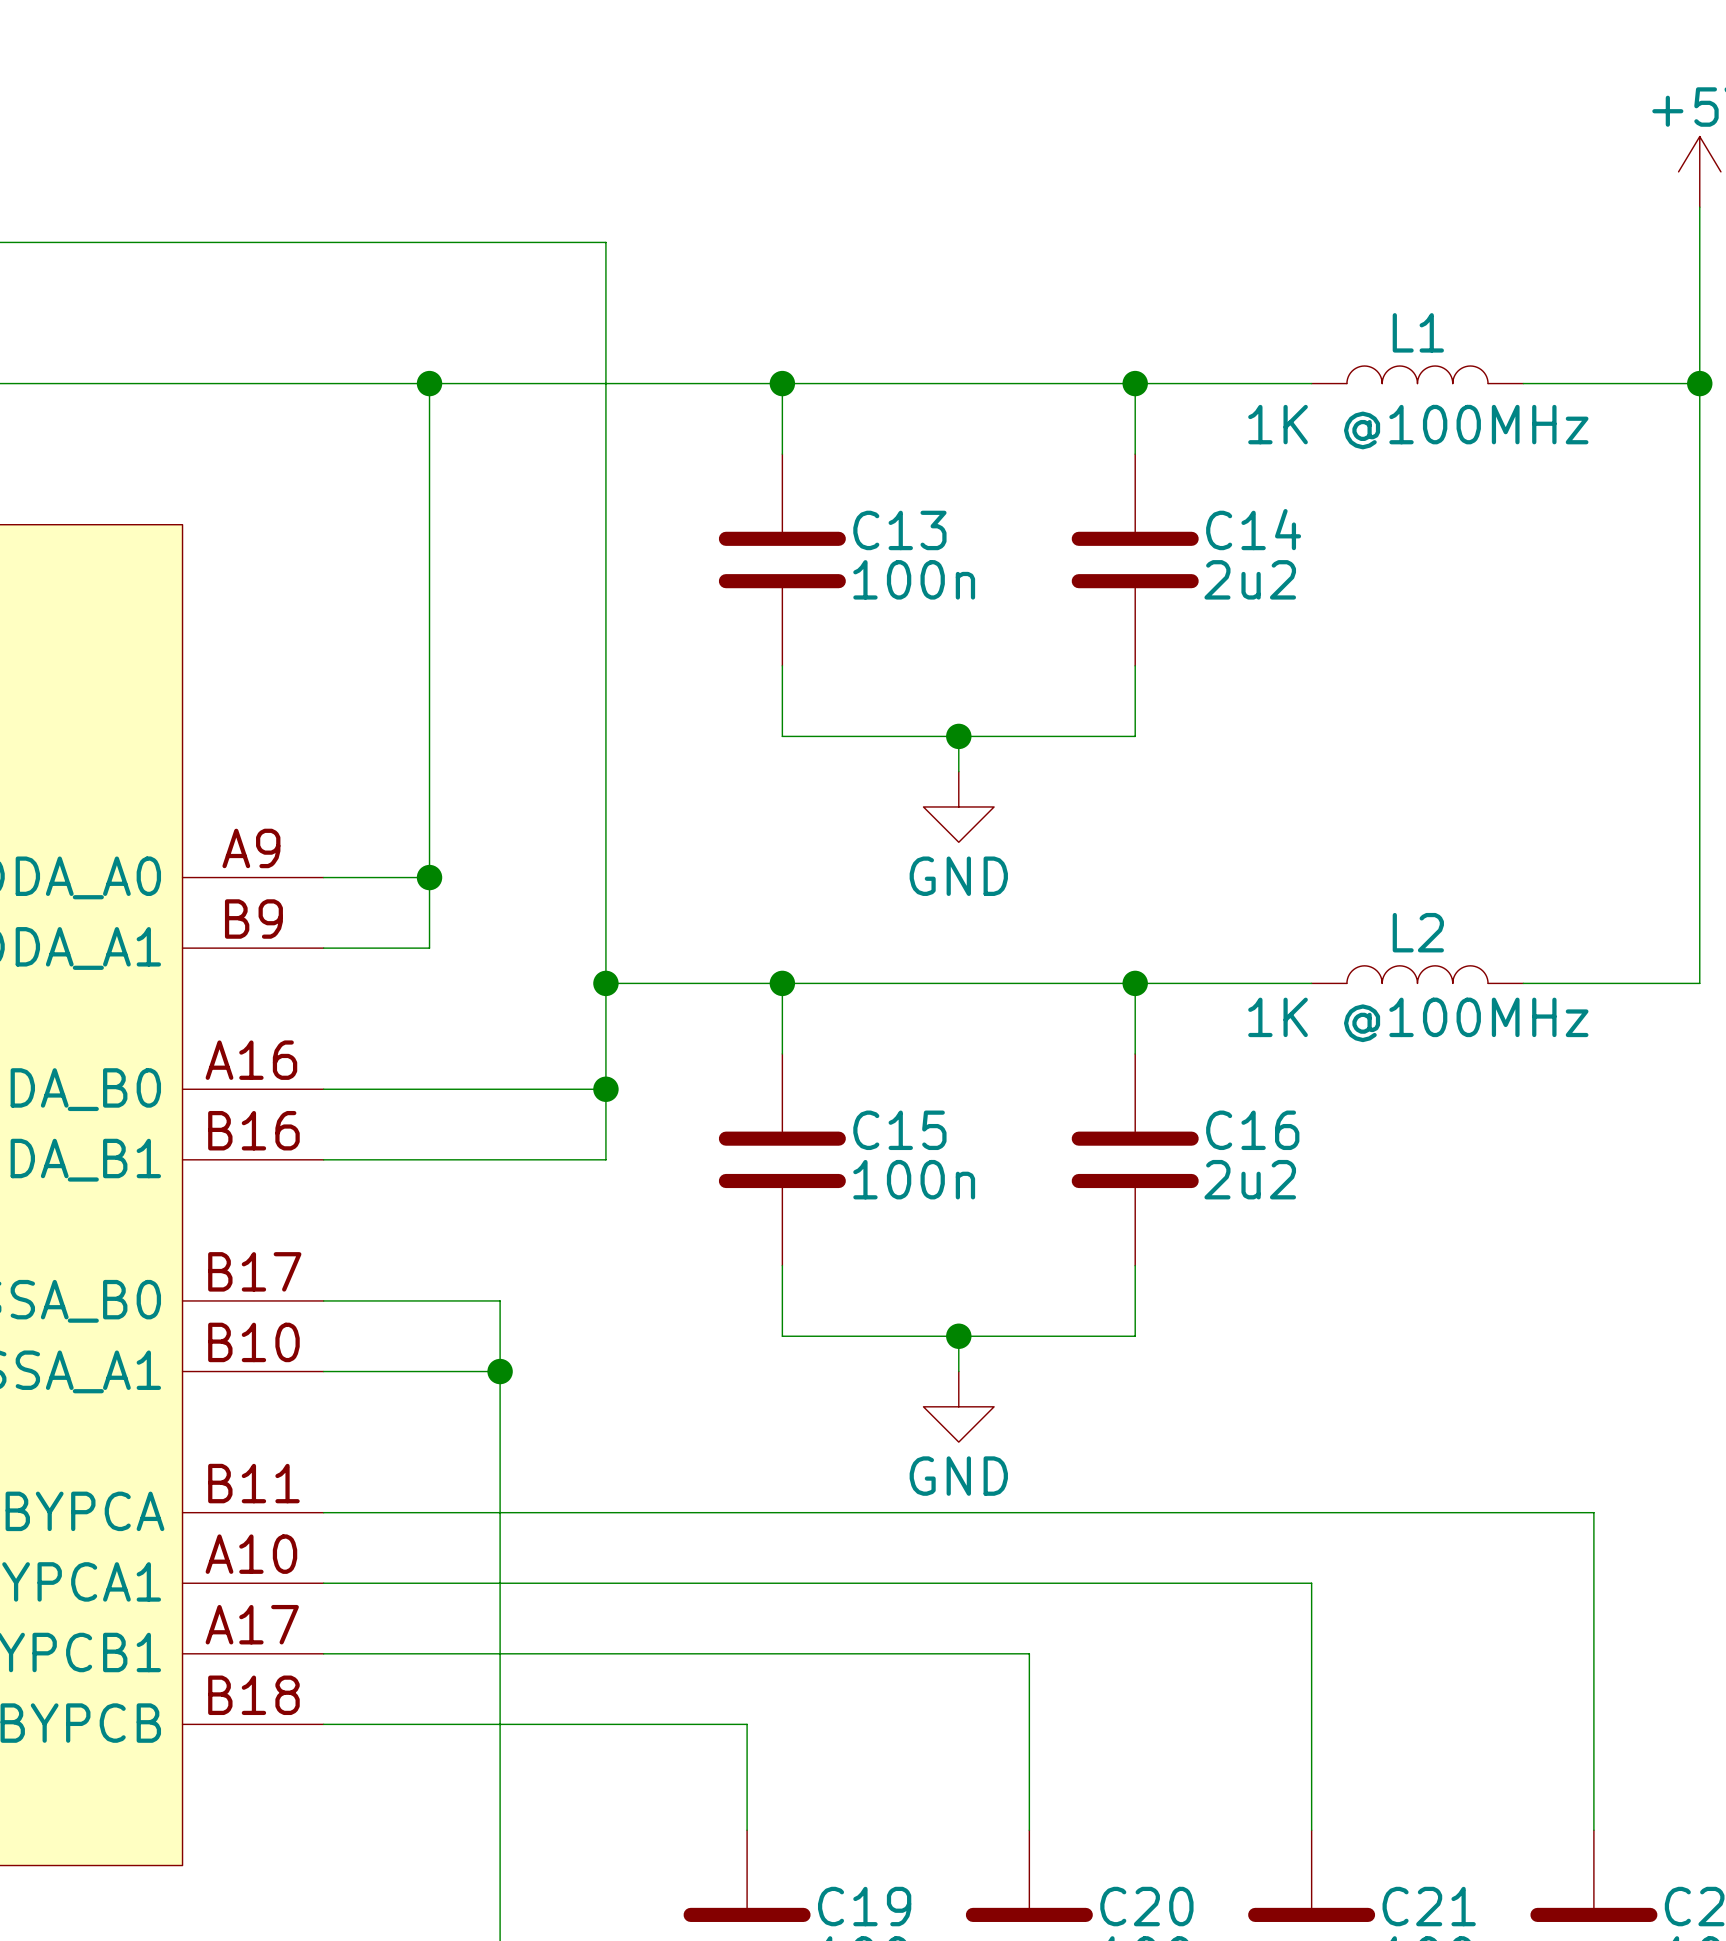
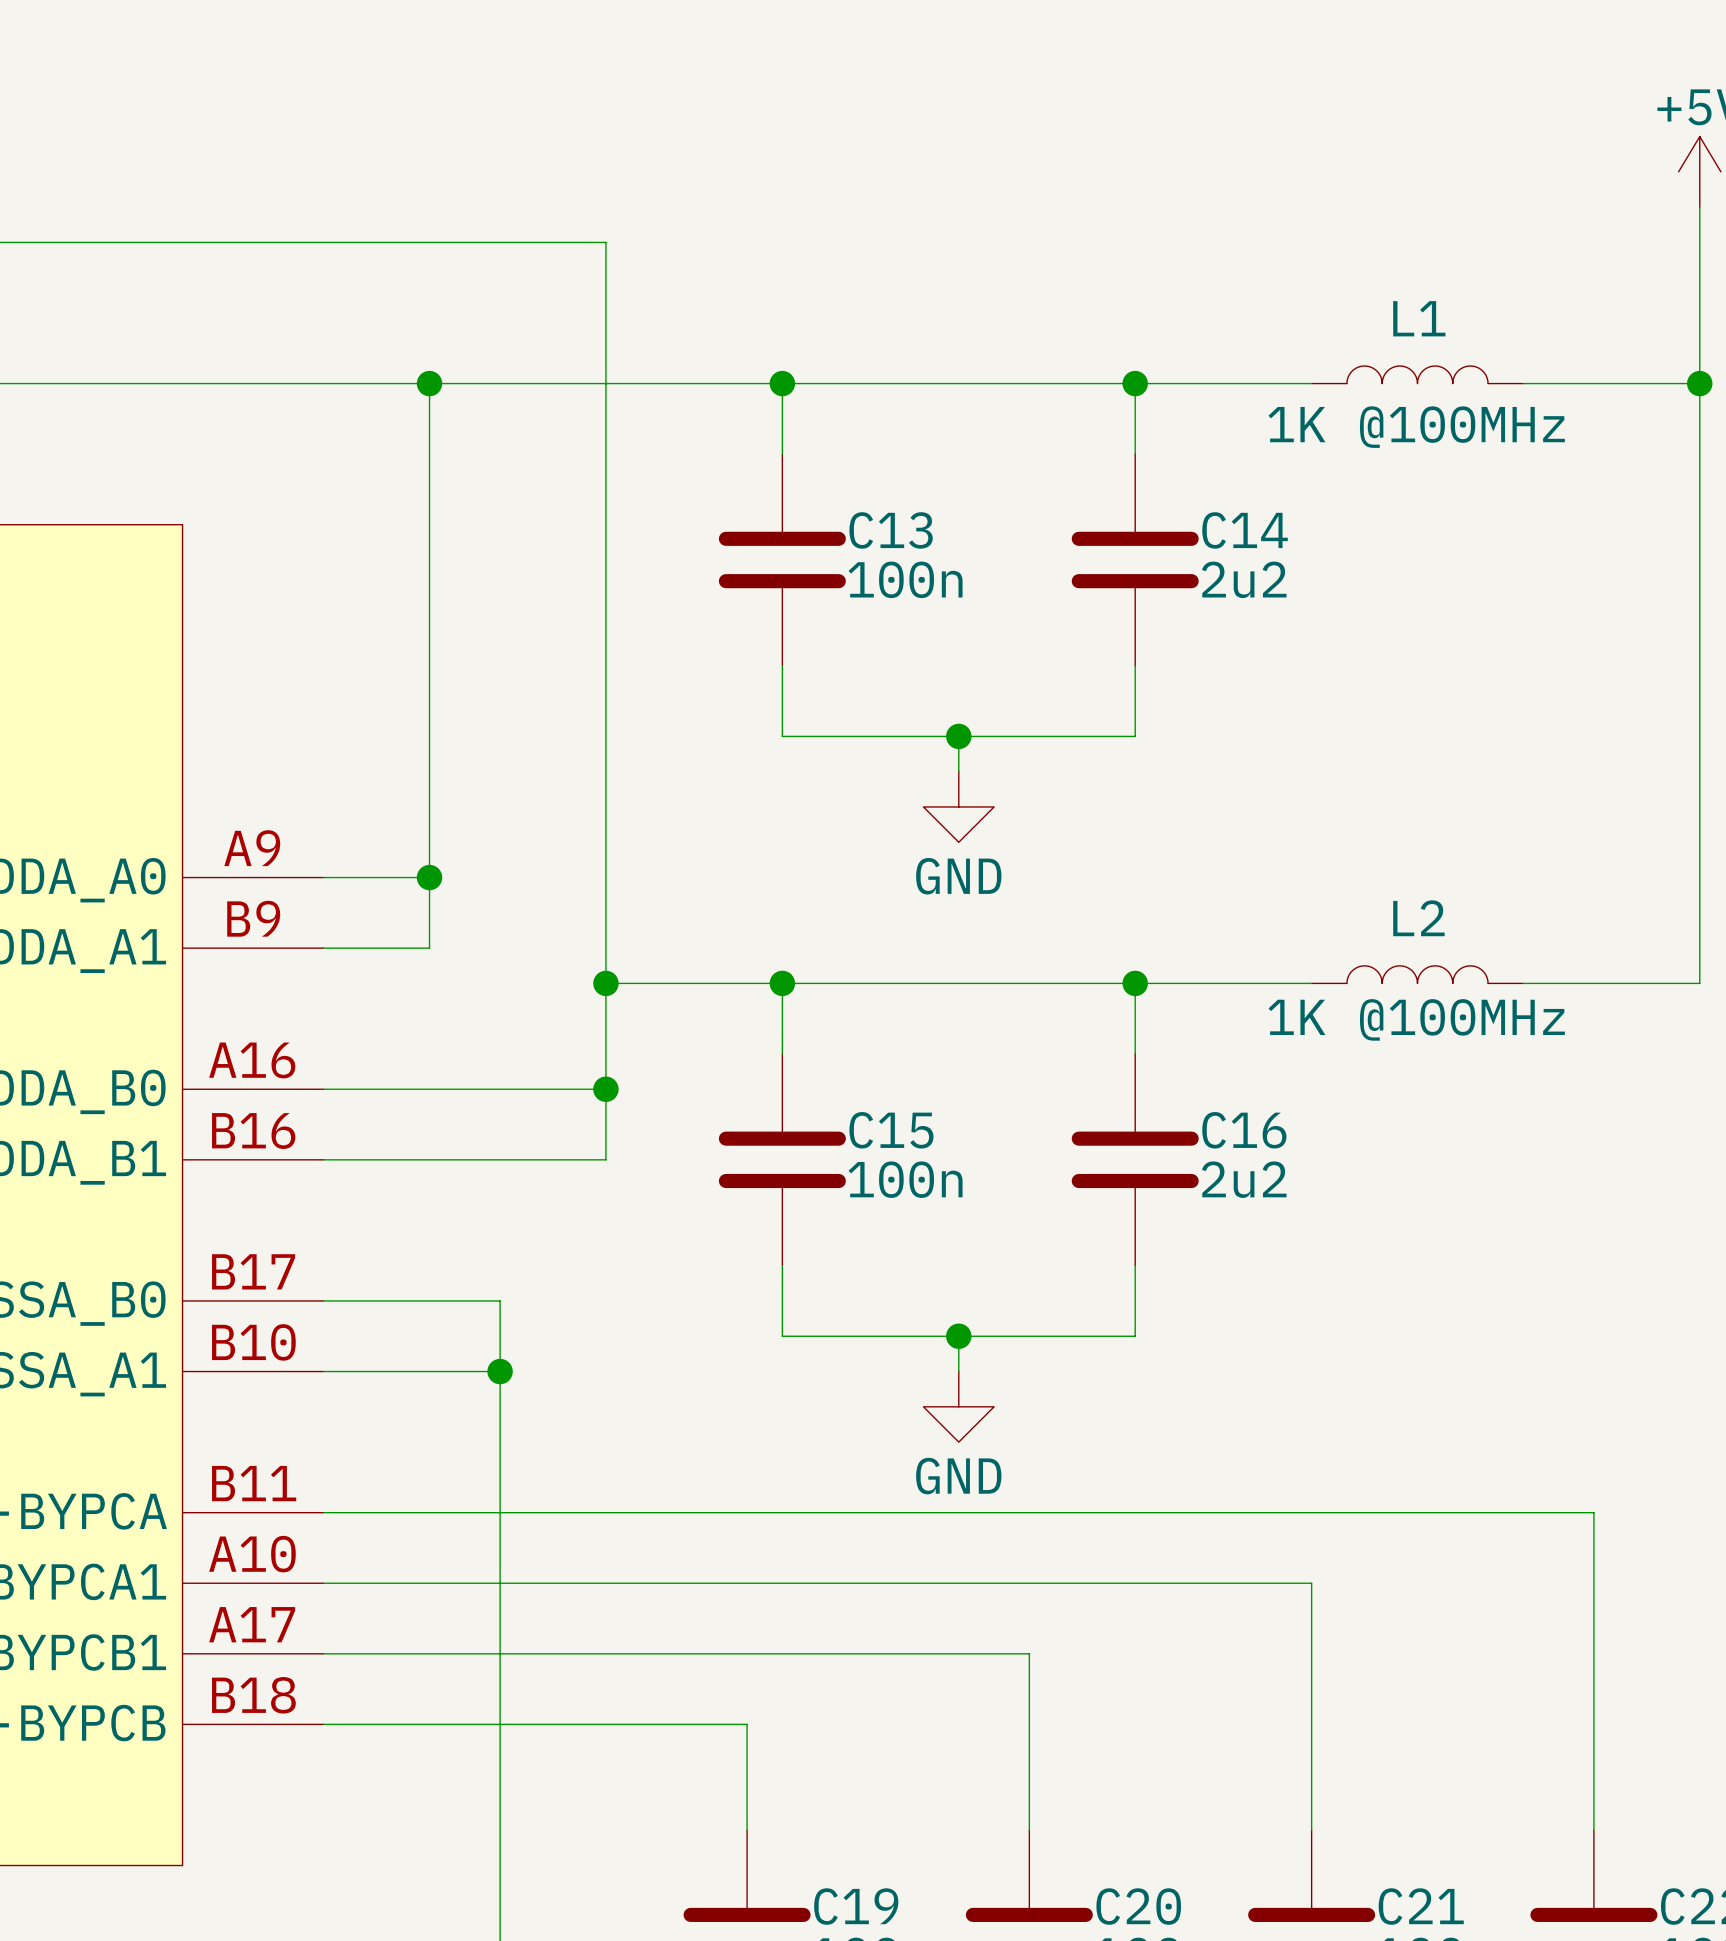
L1 name position: L1 (1418, 332) -> L1 (1419, 318)
L2 name position: L2 (1418, 932) -> L2 (1418, 918)

